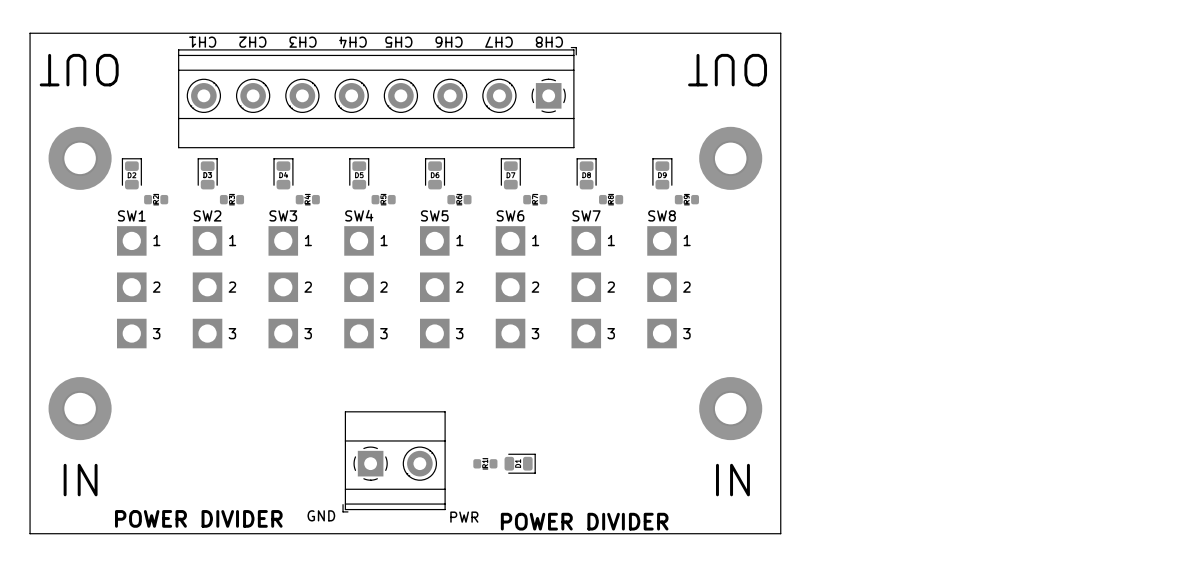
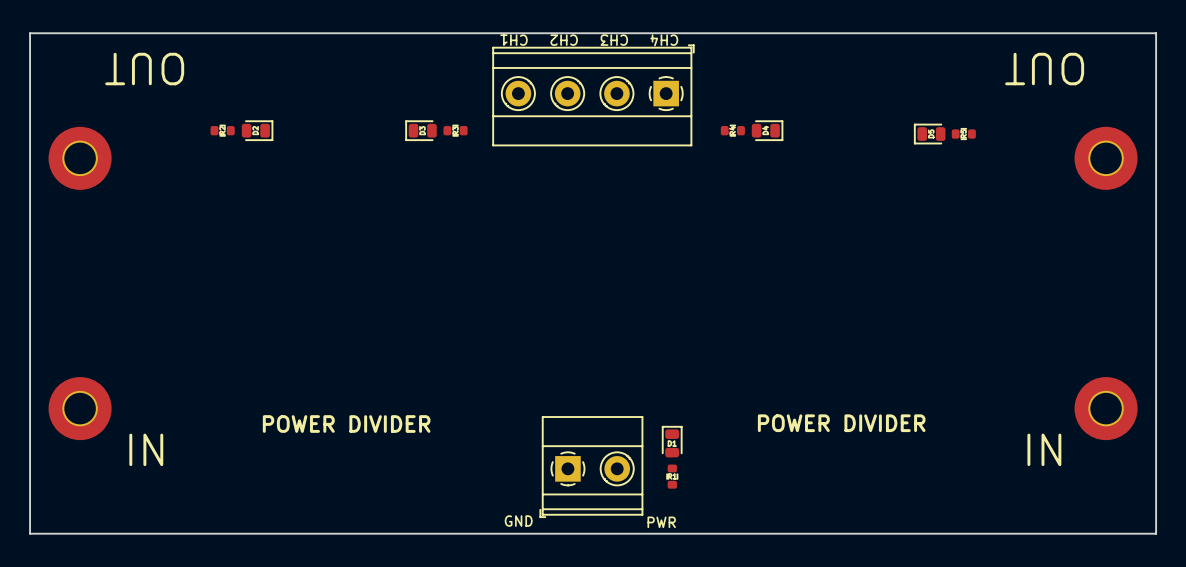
board edge: (780, 33) (780, 533) -> (780, 33) (1156, 33) (1156, 533) (780, 533)
text: none -> CH3 (614, 40)
text: none -> CH4 (664, 40)
text: CH1 (202, 42) -> none
text: CH2 (252, 42) -> none
text: CH3 (303, 42) -> none
text: CH4 (352, 42) -> none
text: CH5 (398, 42) -> none
text: CH6 (449, 42) -> none
text: CH7 (499, 42) -> CH1 (513, 40)
text: CH8 (549, 42) -> CH2 (564, 40)
text: none -> OUT (1044, 69)
text position: OUT (79, 70) -> OUT (144, 69)
text: OUT (727, 70) -> none
part: none -> (593, 95)
part: (377, 97) -> none
part: (730, 158) -> none
part: none -> (1106, 158)
part rotation: 0° (131, 173) -> 90° clockwise (257, 130)
part position: (131, 173) -> (257, 130)
part rotation: 0° (207, 173) -> 90° counterclockwise (421, 130)
part position: (207, 173) -> (421, 130)
part rotation: 0° (283, 173) -> 90° clockwise (767, 130)
part position: (283, 173) -> (767, 130)
part rotation: 0° (359, 173) -> 90° counterclockwise (929, 134)
part position: (359, 173) -> (929, 134)
part: (435, 173) -> none
part: (510, 173) -> none
part: (586, 173) -> none
part: (662, 173) -> none
part position: (156, 199) -> (222, 130)
part position: (231, 199) -> (455, 130)
part position: (307, 199) -> (732, 130)
part position: (383, 199) -> (963, 134)
part: (459, 199) -> none
part: (535, 199) -> none
part: (611, 199) -> none
part: (686, 199) -> none
SW1: (131, 287) -> none
SW2: (207, 287) -> none
SW3: (283, 287) -> none
SW4: (359, 287) -> none
SW5: (434, 287) -> none
SW6: (510, 287) -> none
SW7: (586, 287) -> none
SW8: (662, 287) -> none
part: (730, 408) -> none
part: none -> (1106, 408)
text: none -> POWER DIVIDER (841, 423)
text: none -> POWER DIVIDER (346, 424)
text: none -> IN (1044, 449)
part position: (394, 461) -> (591, 467)
part rotation: 0° (485, 463) -> 90° clockwise (672, 476)
part position: (485, 463) -> (672, 476)
part rotation: 0° (520, 463) -> 90° counterclockwise (672, 441)
part position: (520, 463) -> (672, 441)
text position: IN (80, 480) -> IN (146, 449)
text: IN (732, 480) -> none
text position: GND (321, 515) -> GND (518, 521)
text position: PWR (464, 517) -> PWR (661, 522)
text: POWER DIVIDER (198, 518) -> none
text: POWER DIVIDER (584, 521) -> none

